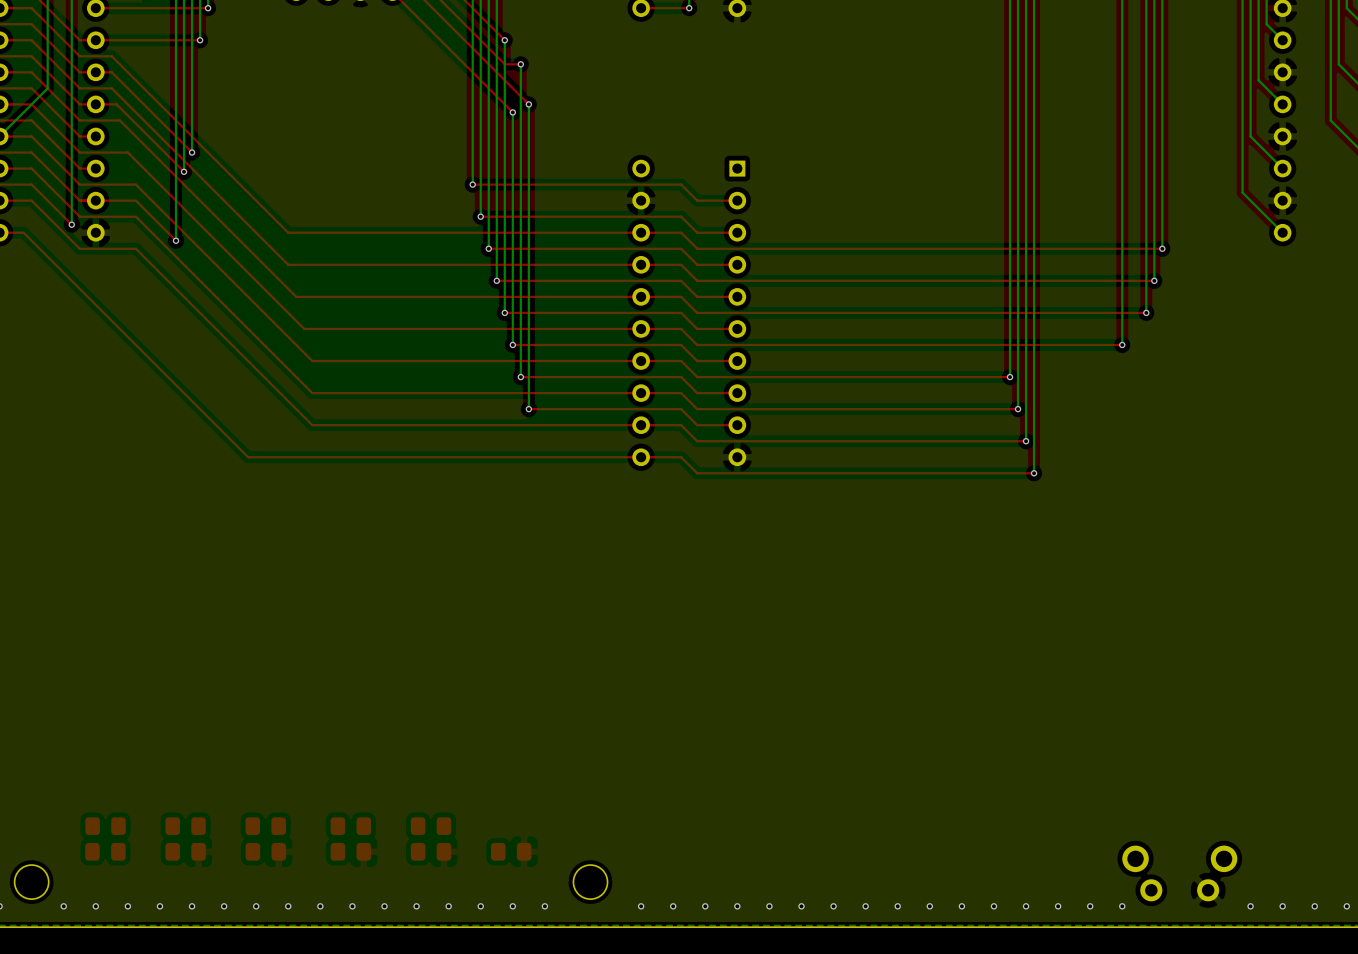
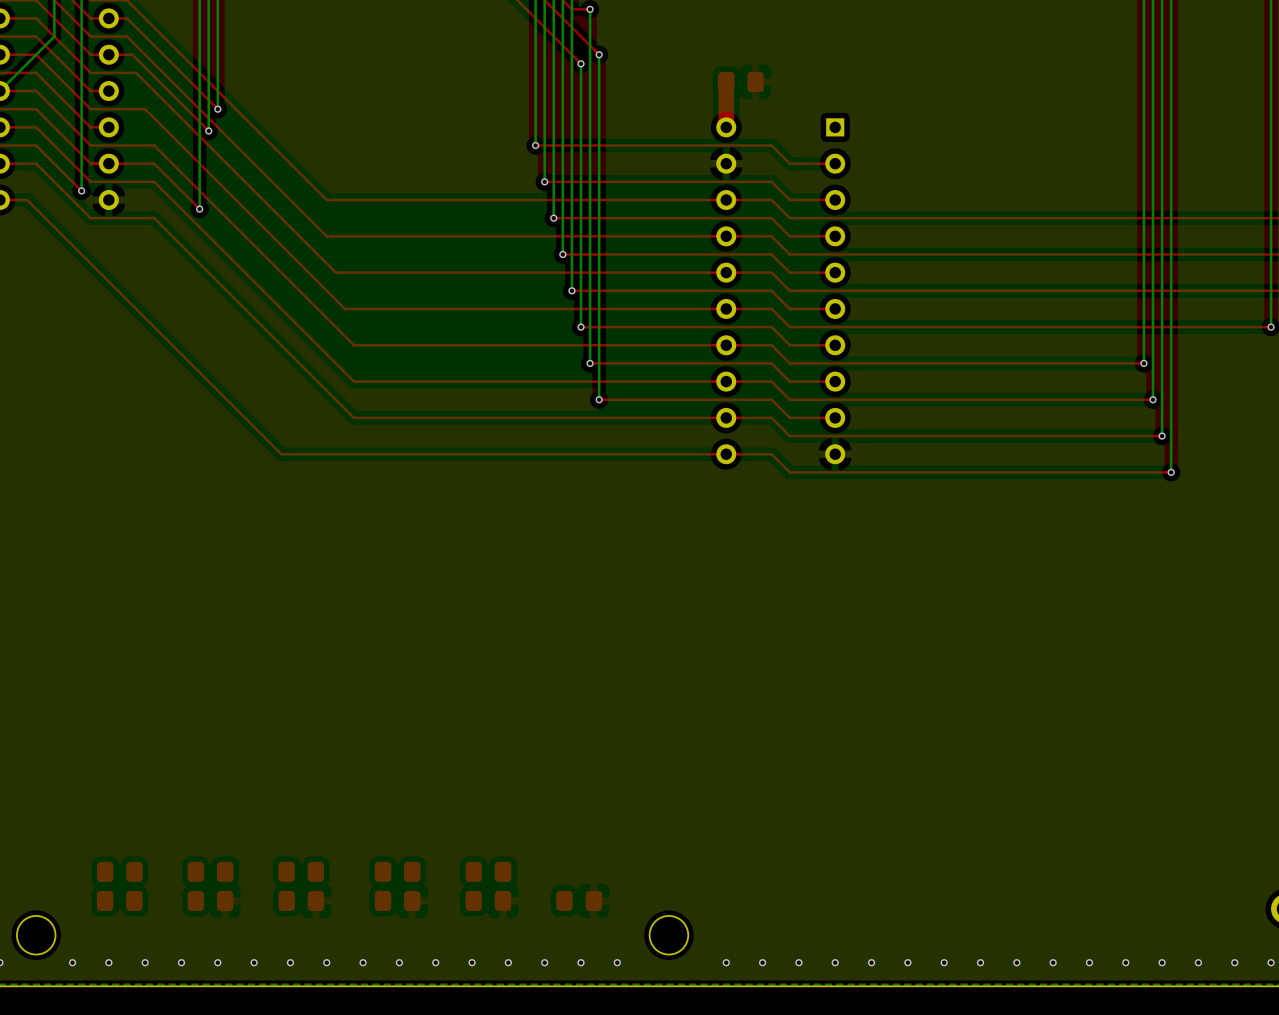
top track: none -> (726, 81) (726, 127)
part: none -> (740, 81)

